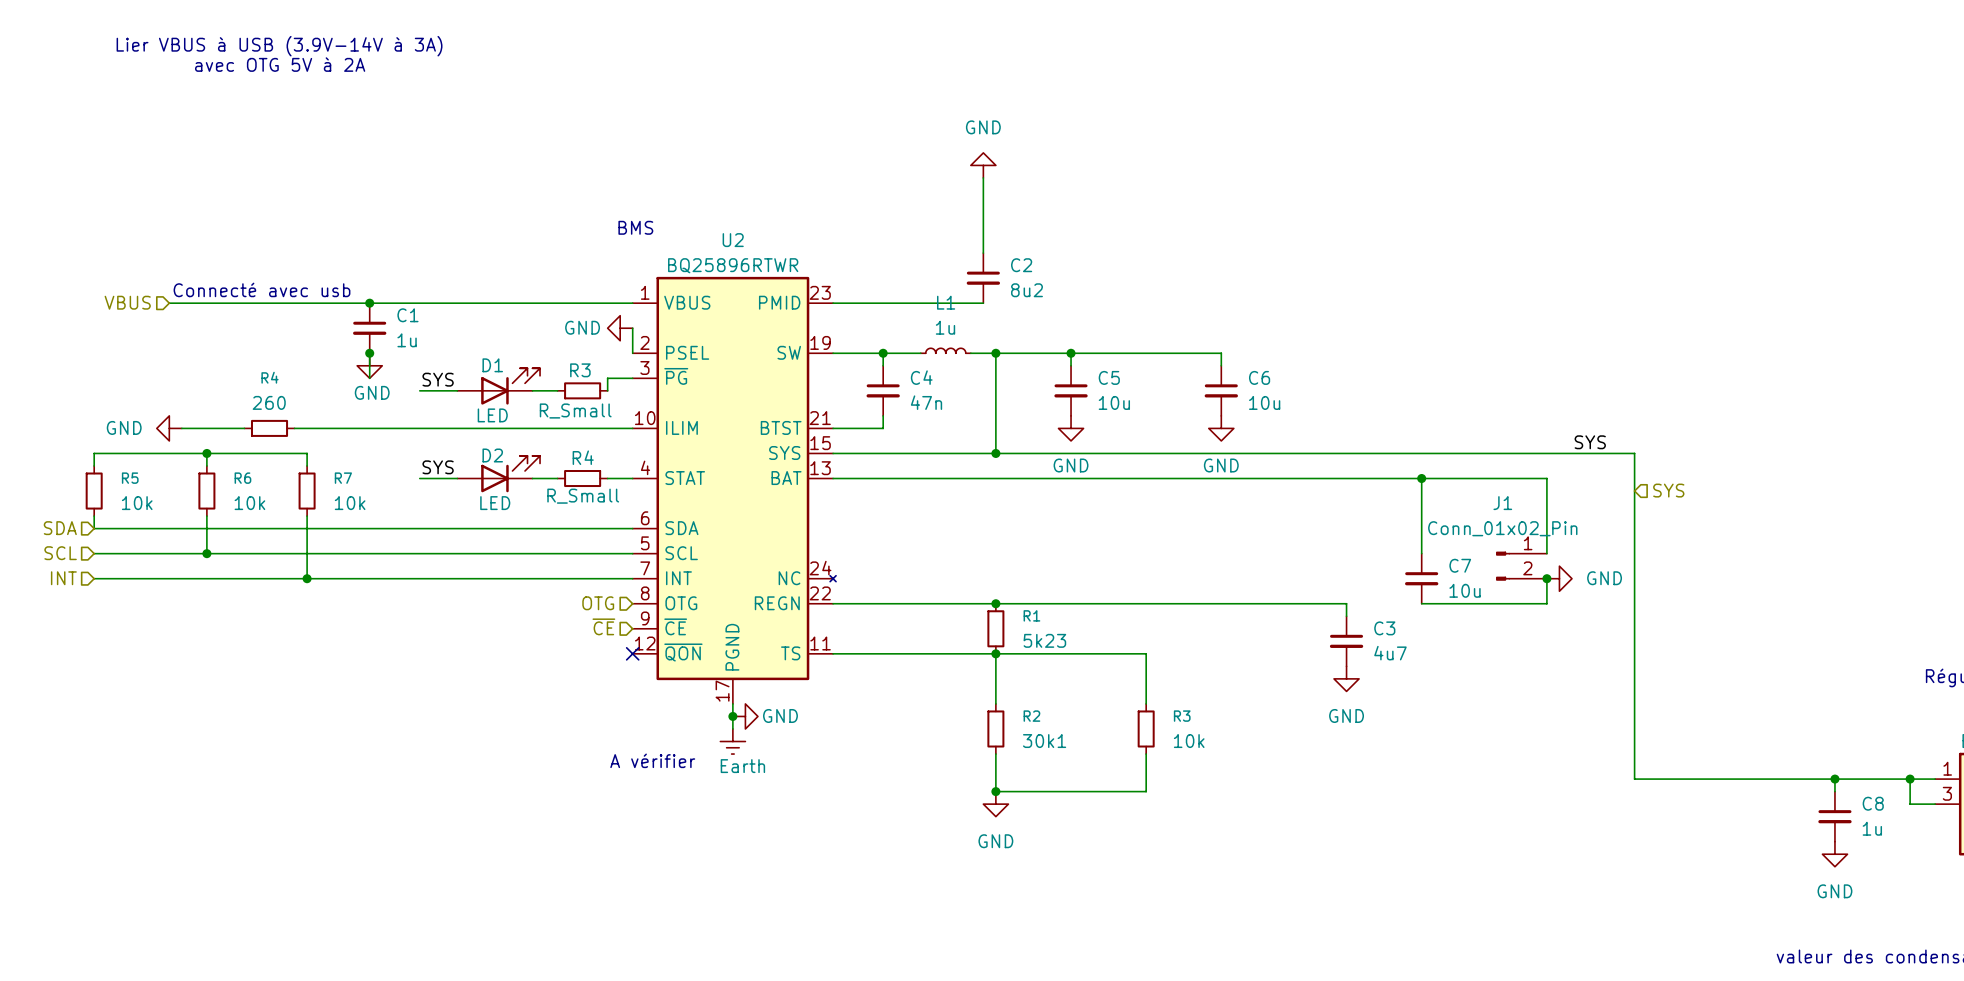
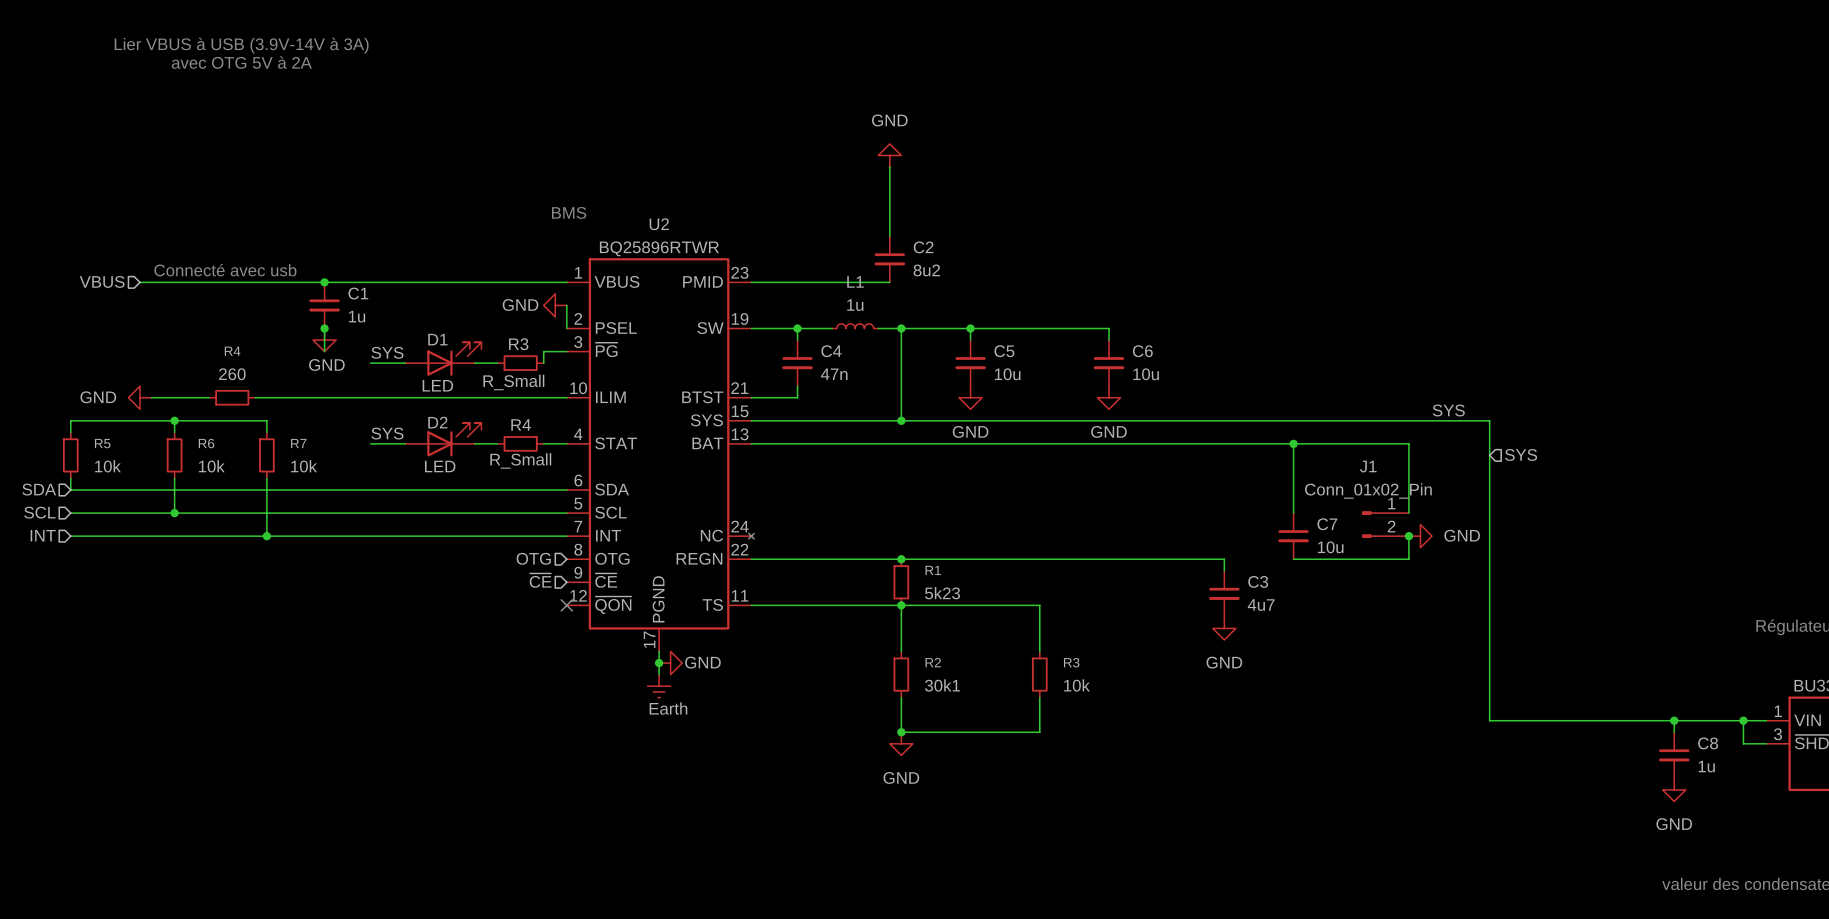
text: A vérifier (652, 760) -> none

